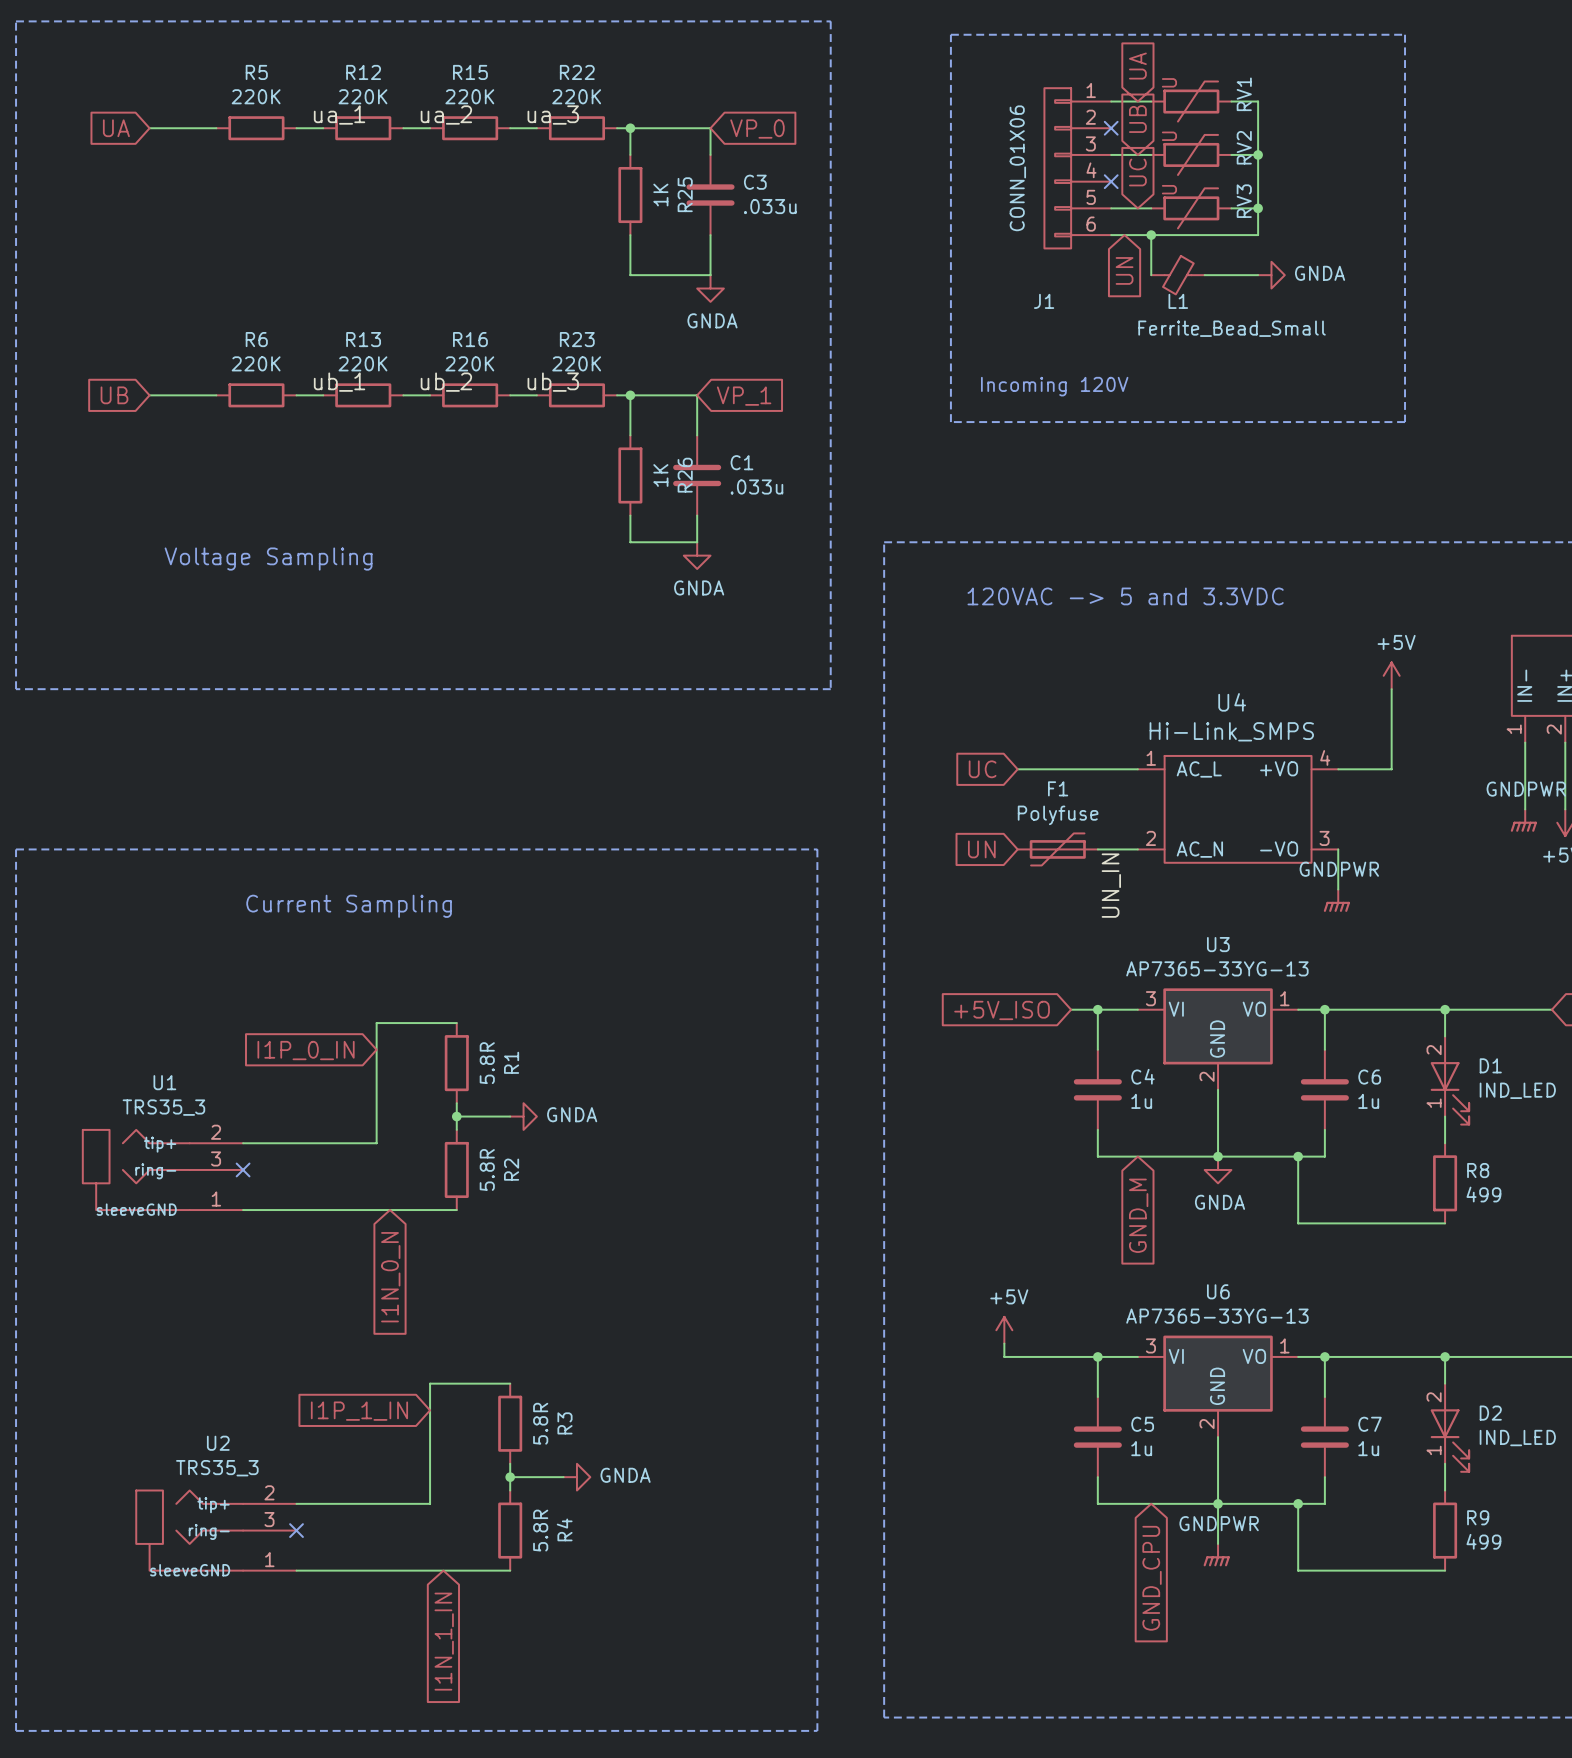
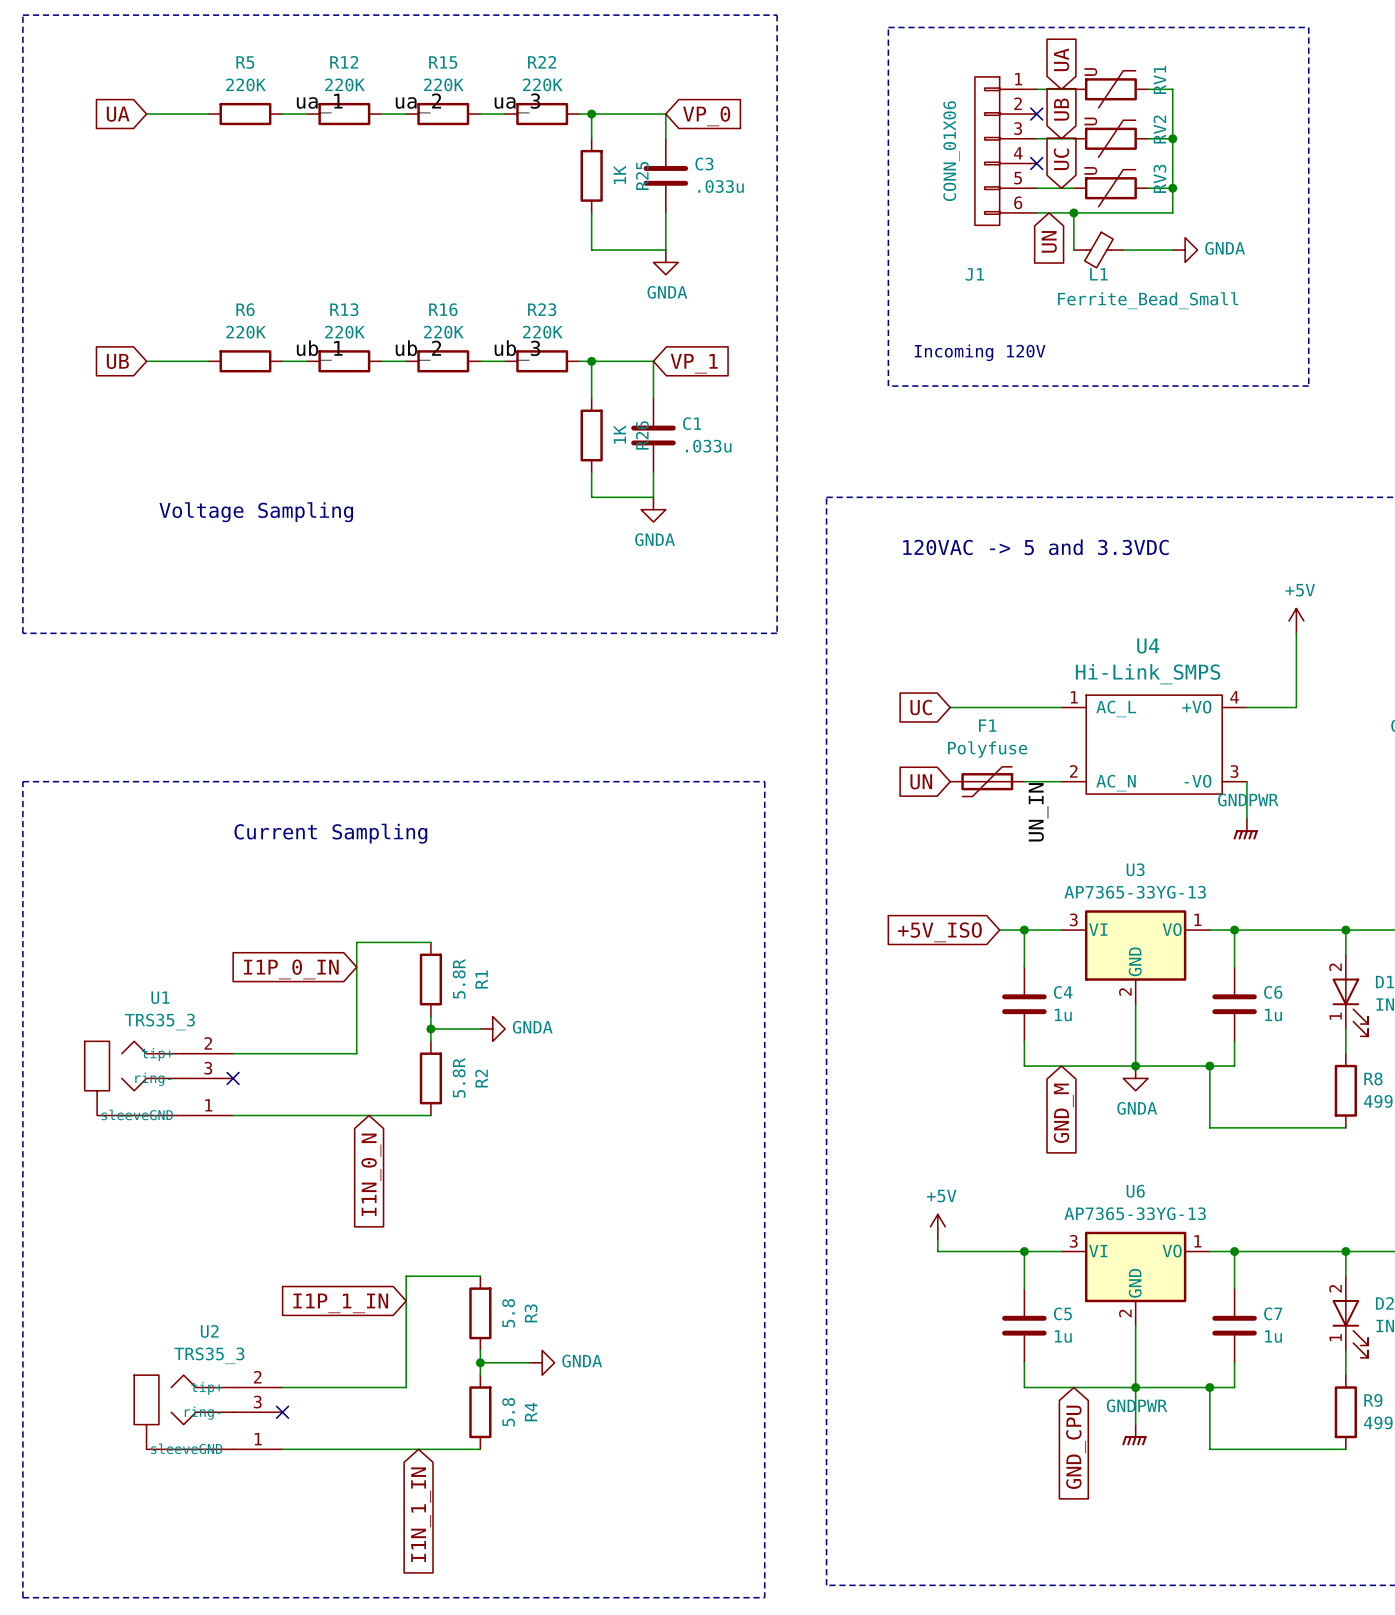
R3 value: 5.8R (540, 1423) -> 5.8 (508, 1313)
R4 value: 5.8R (540, 1530) -> 5.8 (508, 1412)

